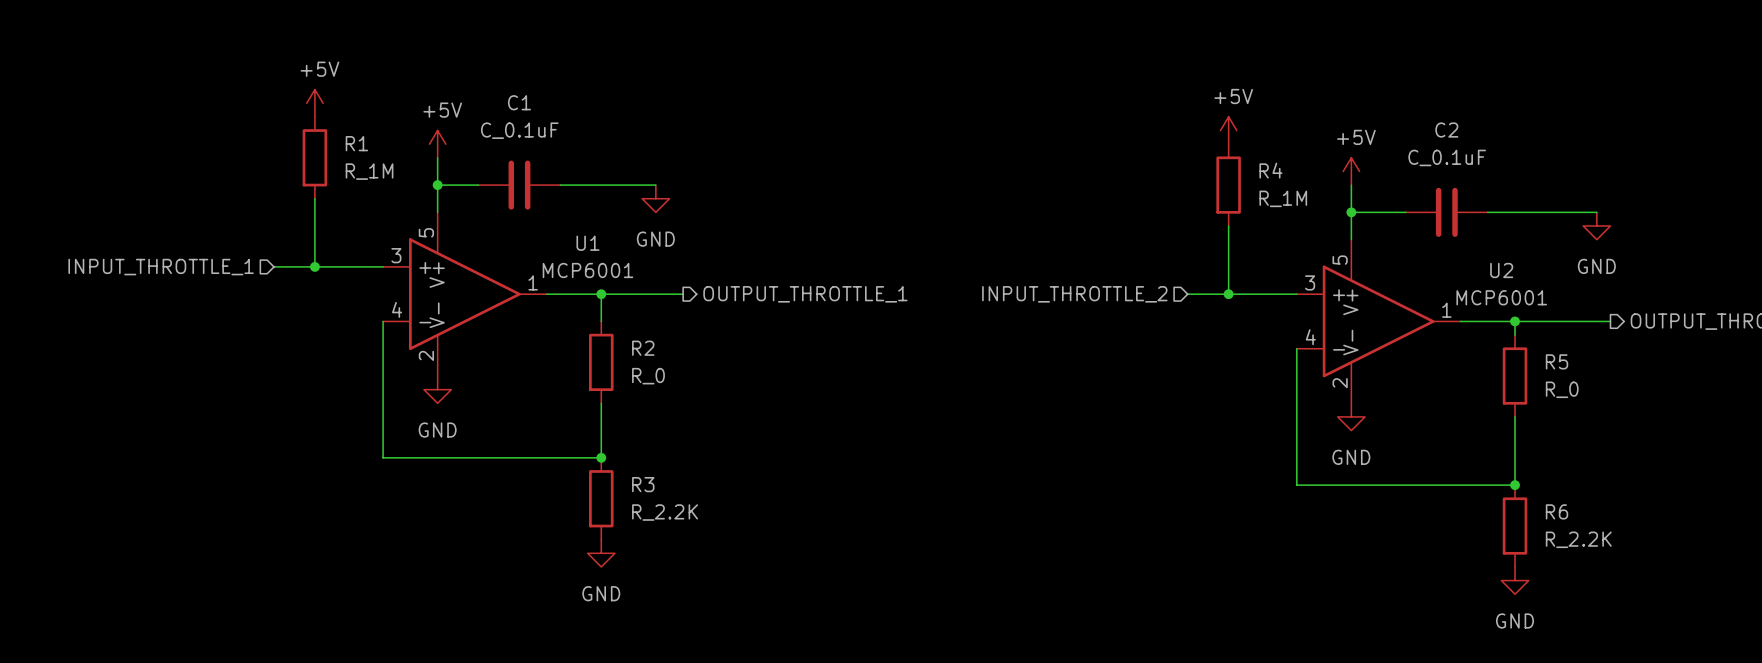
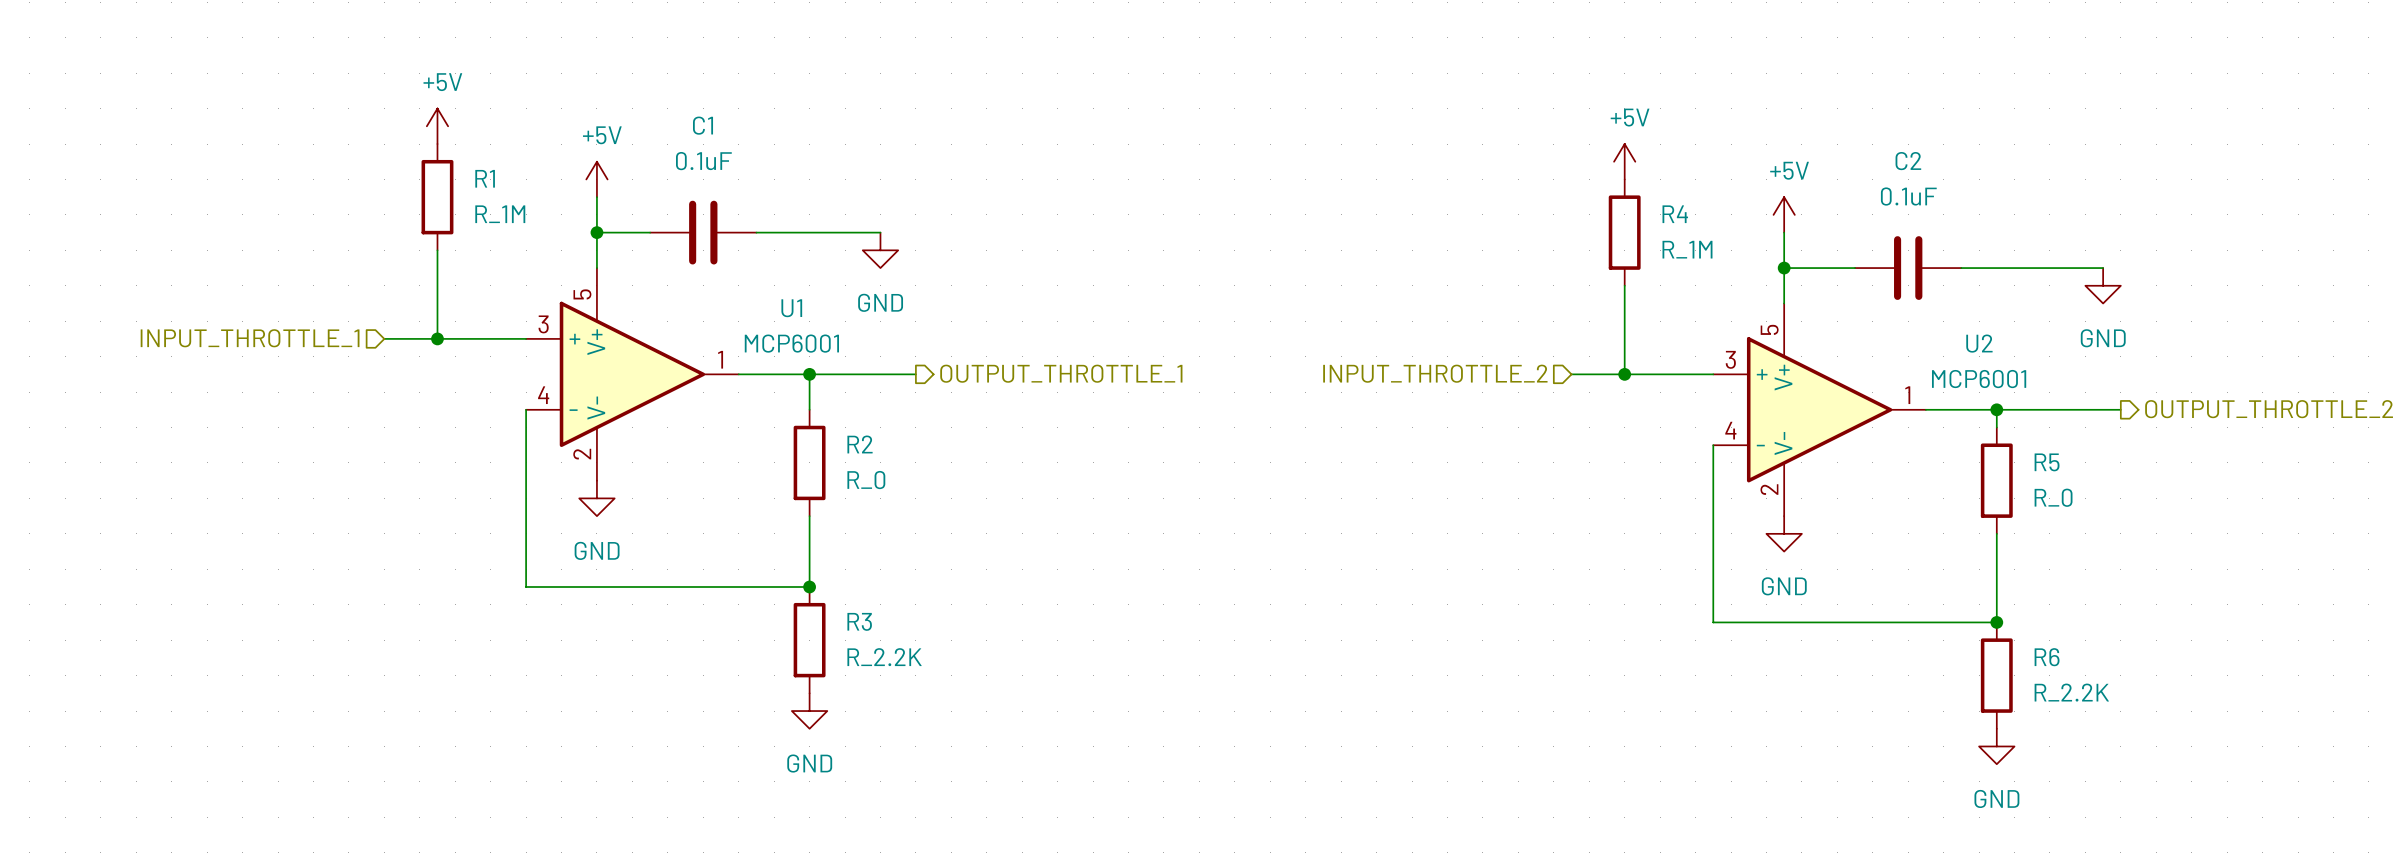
C1 value: C_0.1uF (519, 130) -> 0.1uF (703, 161)
C2 value: C_0.1uF (1447, 157) -> 0.1uF (1908, 196)

